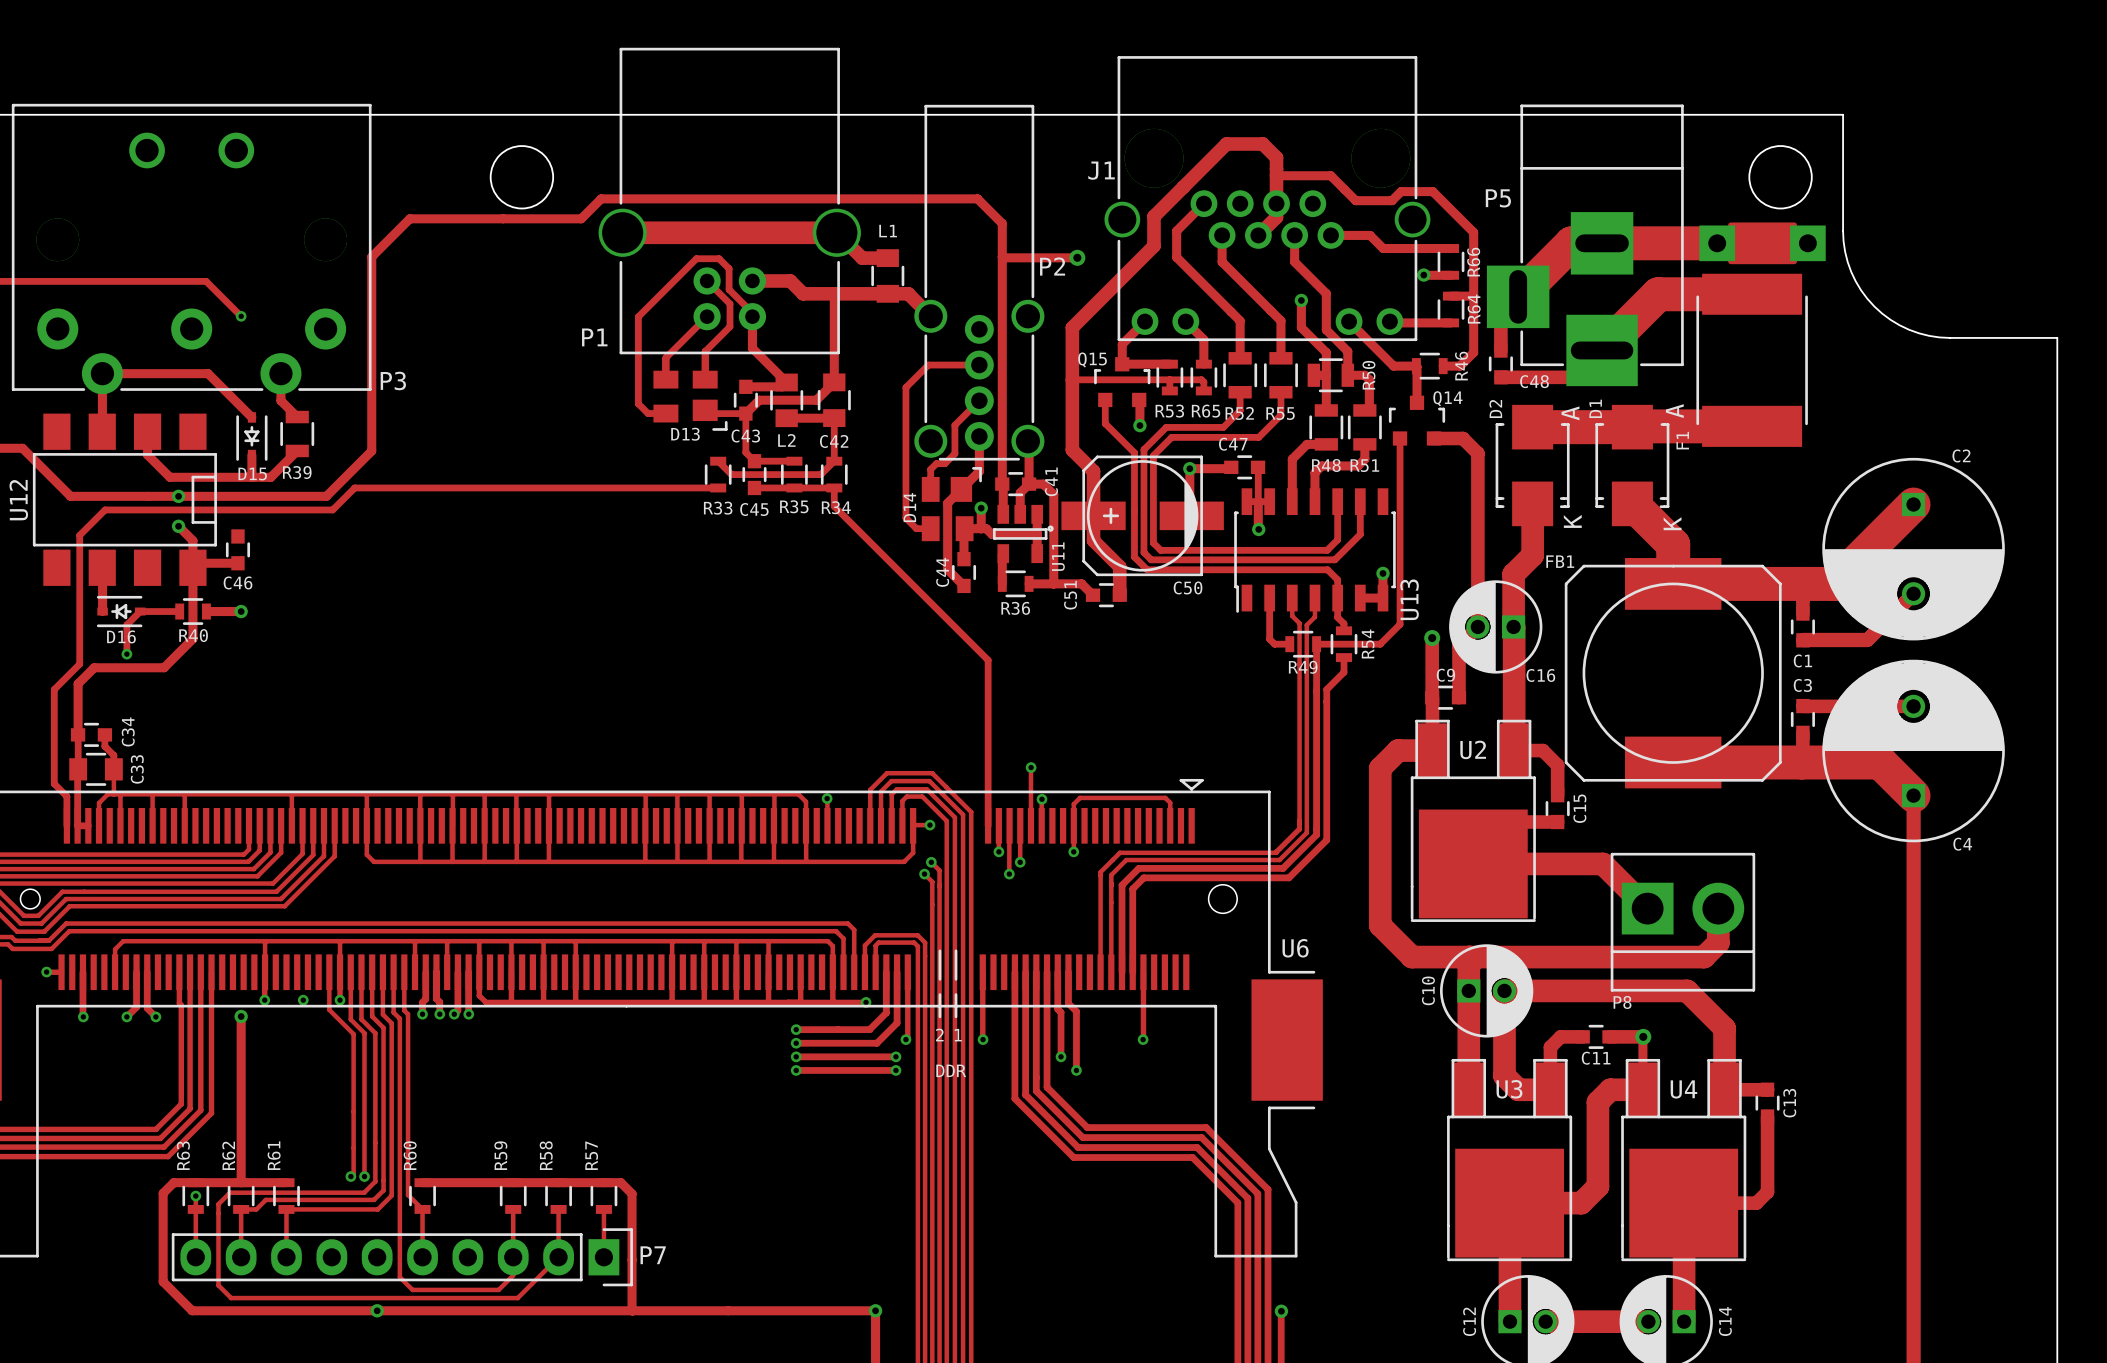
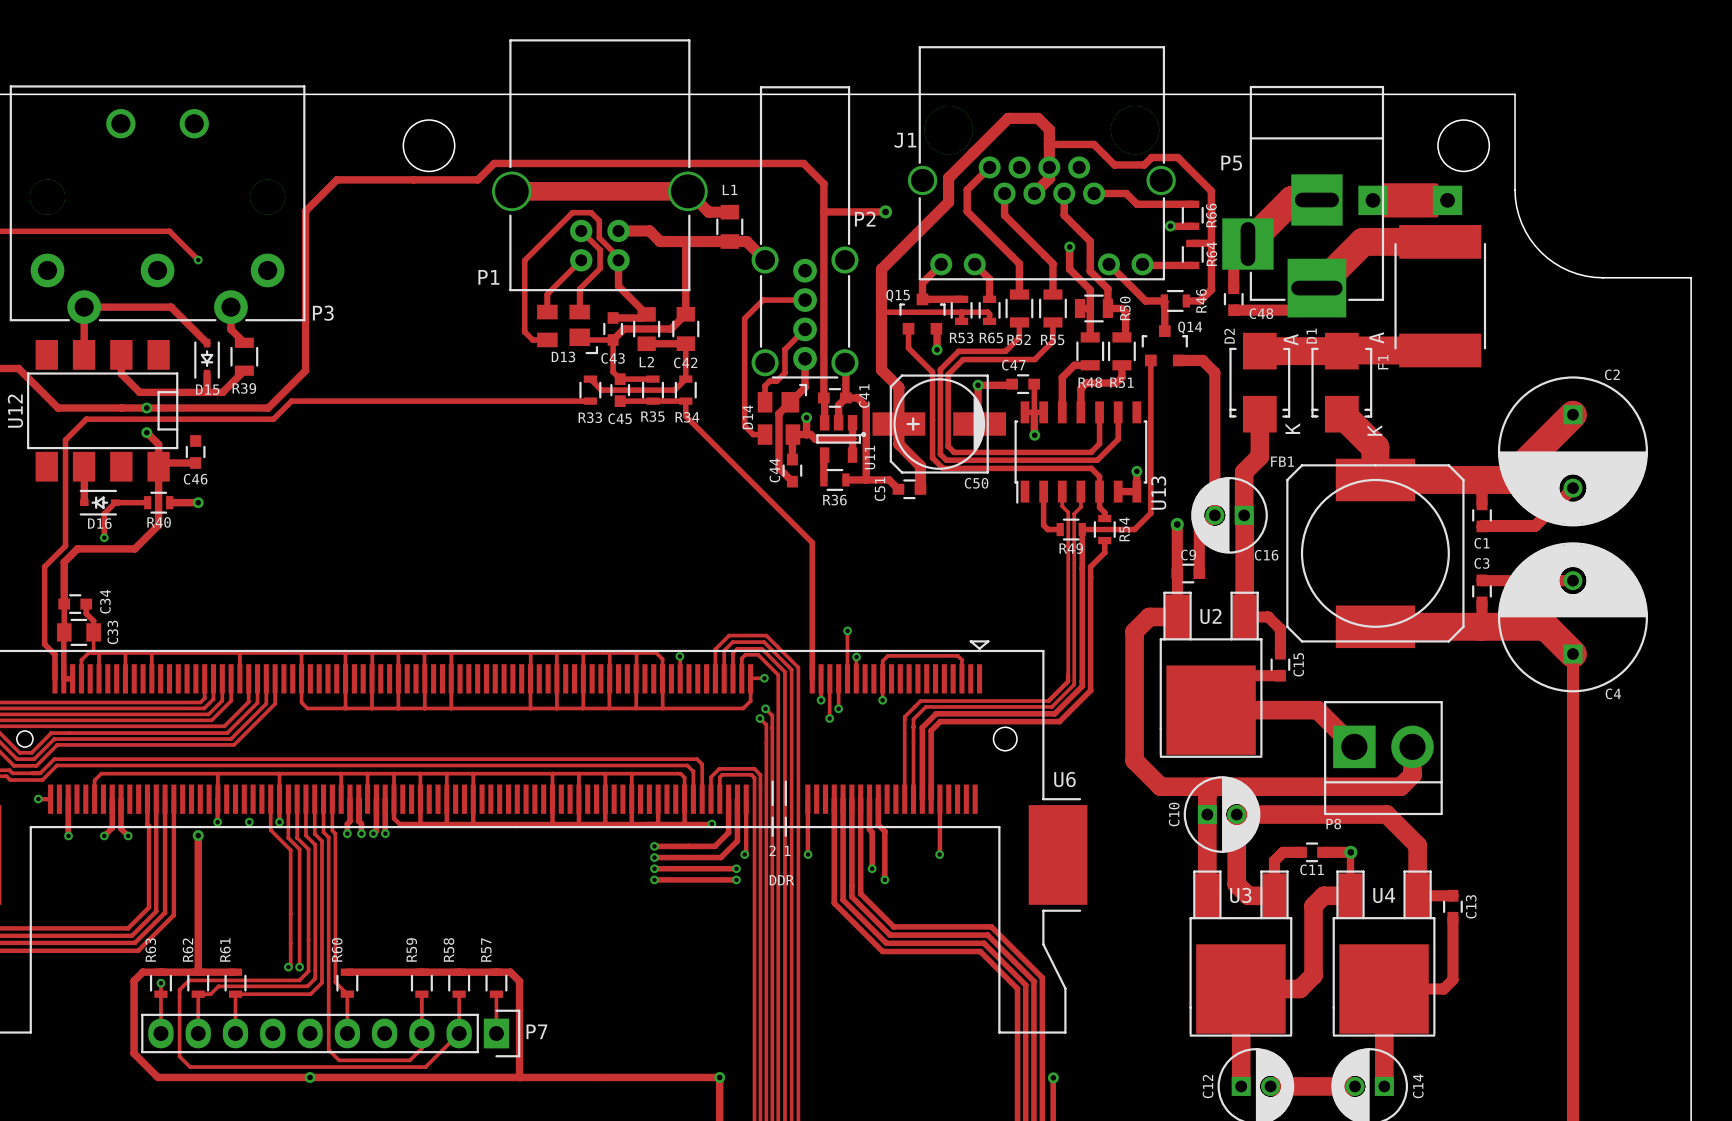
track: (1602, 243) (1717, 243) -> none
part position: (1762, 243) -> (1410, 200)

